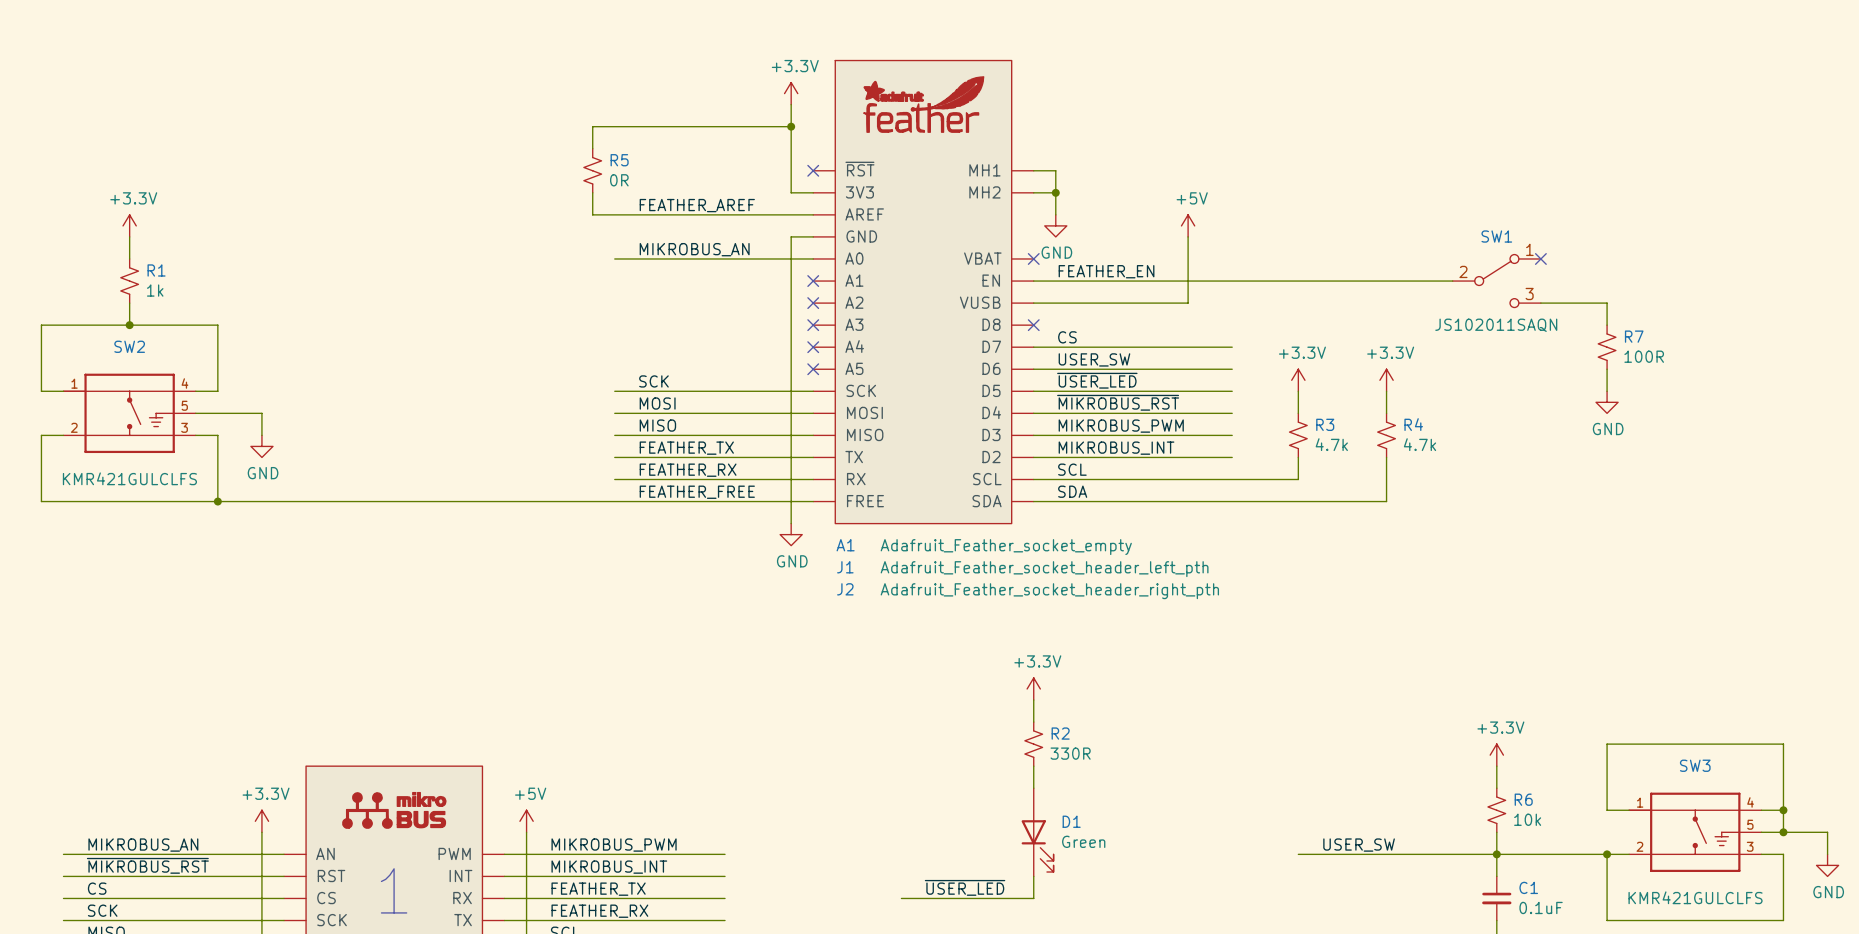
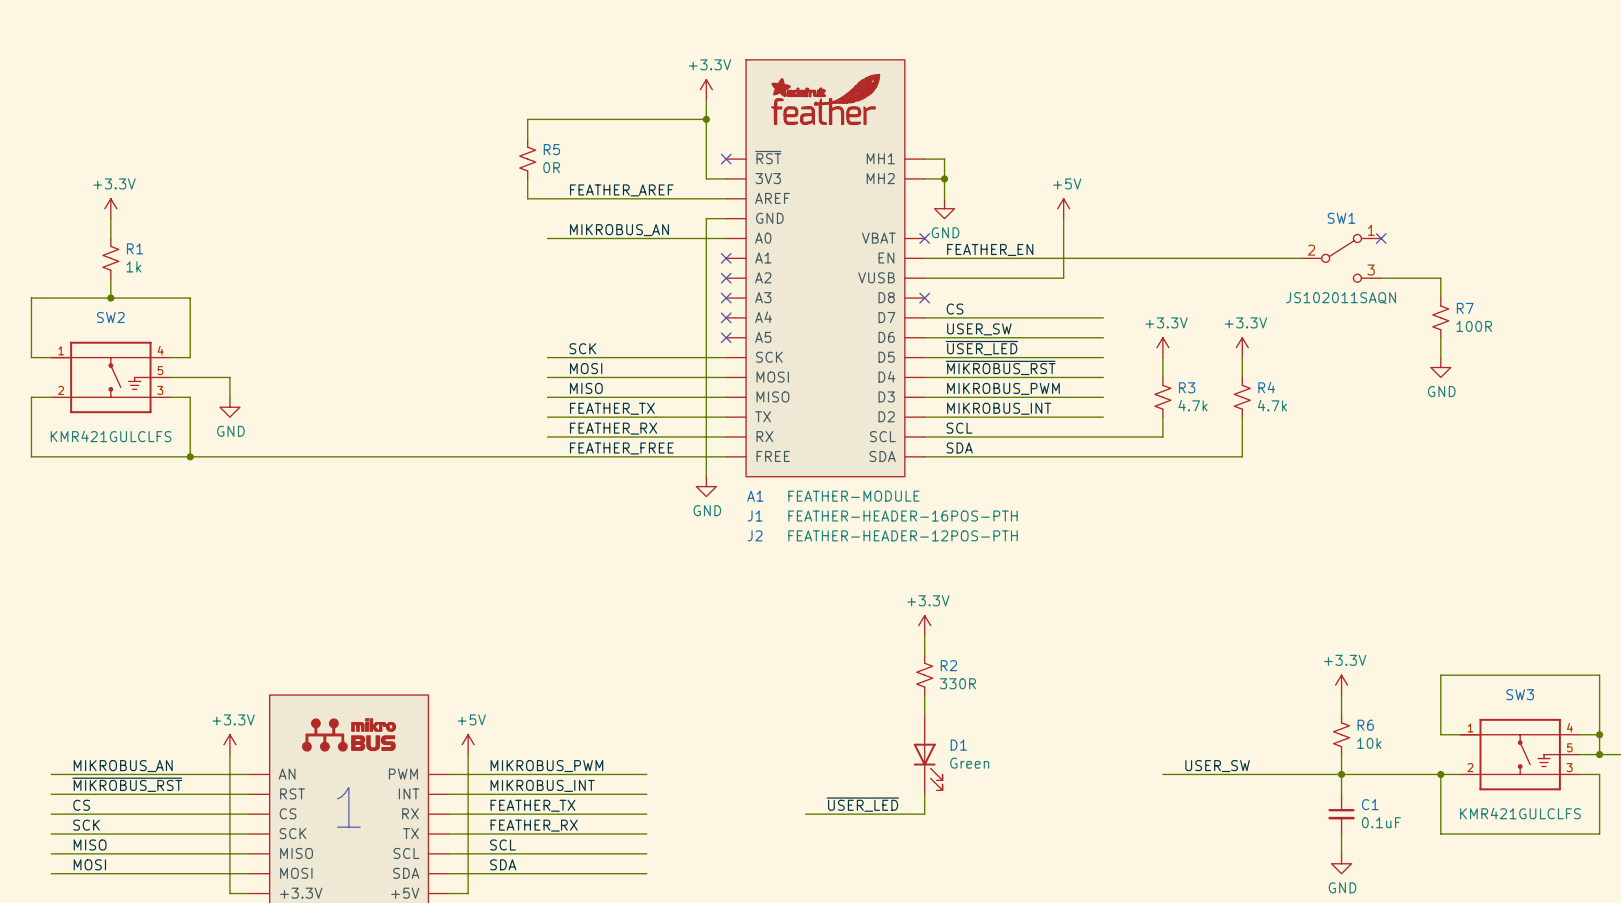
A1 value: Adafruit_Feather_socket_empty (1006, 547) -> FEATHER-MODULE (853, 496)
J1 value: Adafruit_Feather_socket_header_left_pth (1044, 569) -> FEATHER-HEADER-16POS-PTH (903, 516)
J2 value: Adafruit_Feather_socket_header_right_pth (1049, 591) -> FEATHER-HEADER-12POS-PTH (903, 535)

